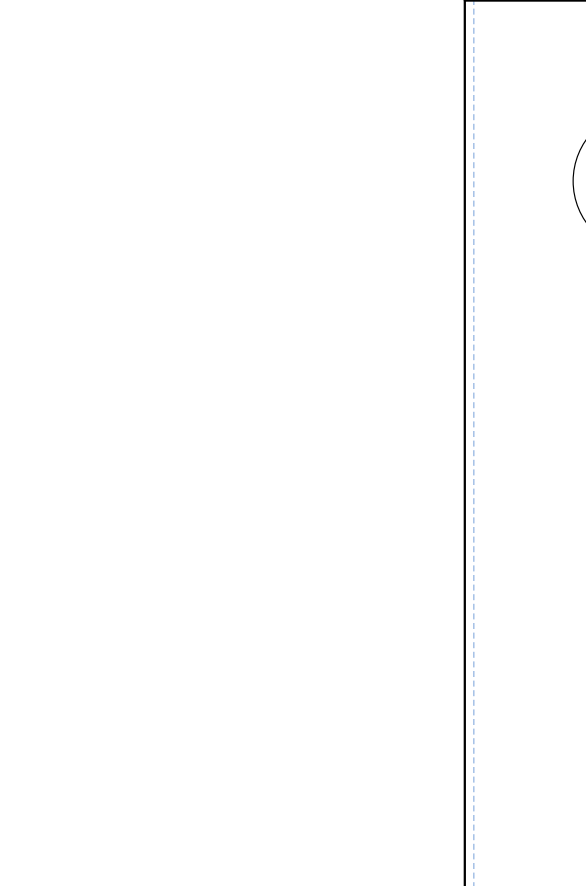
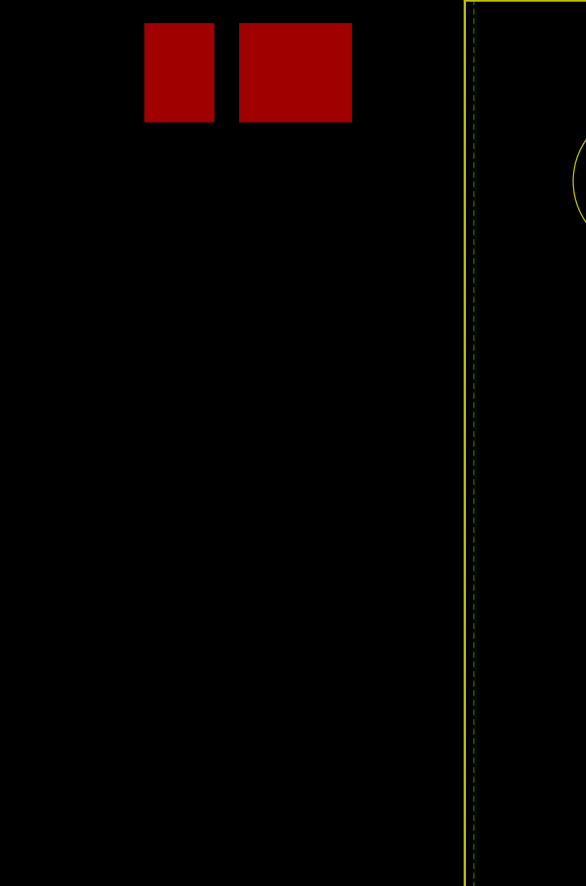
part: none -> (248, 72)

